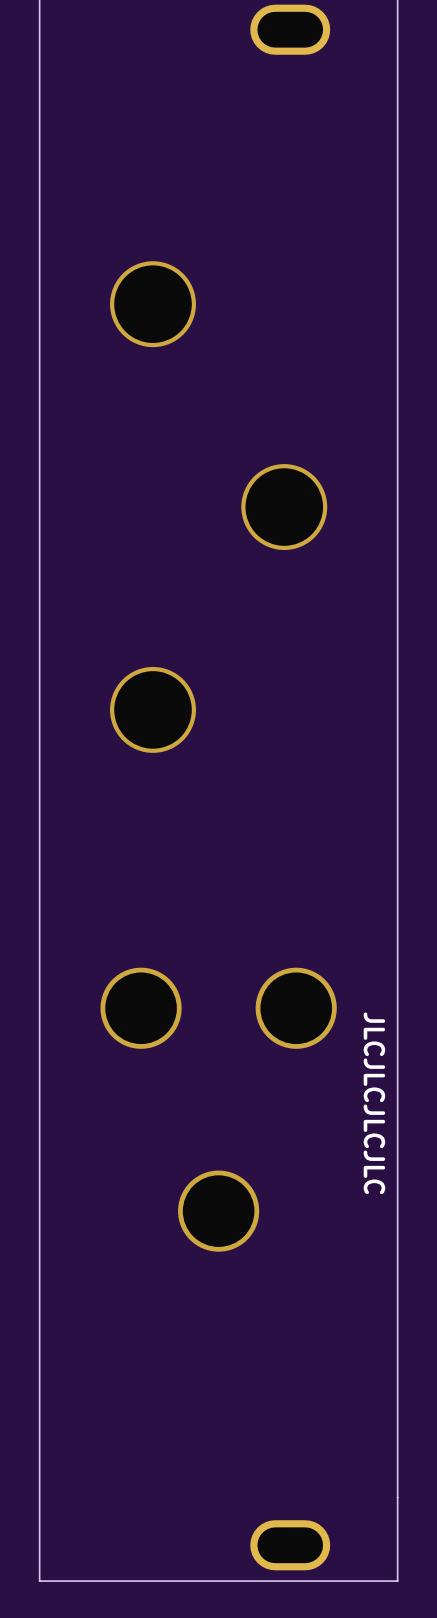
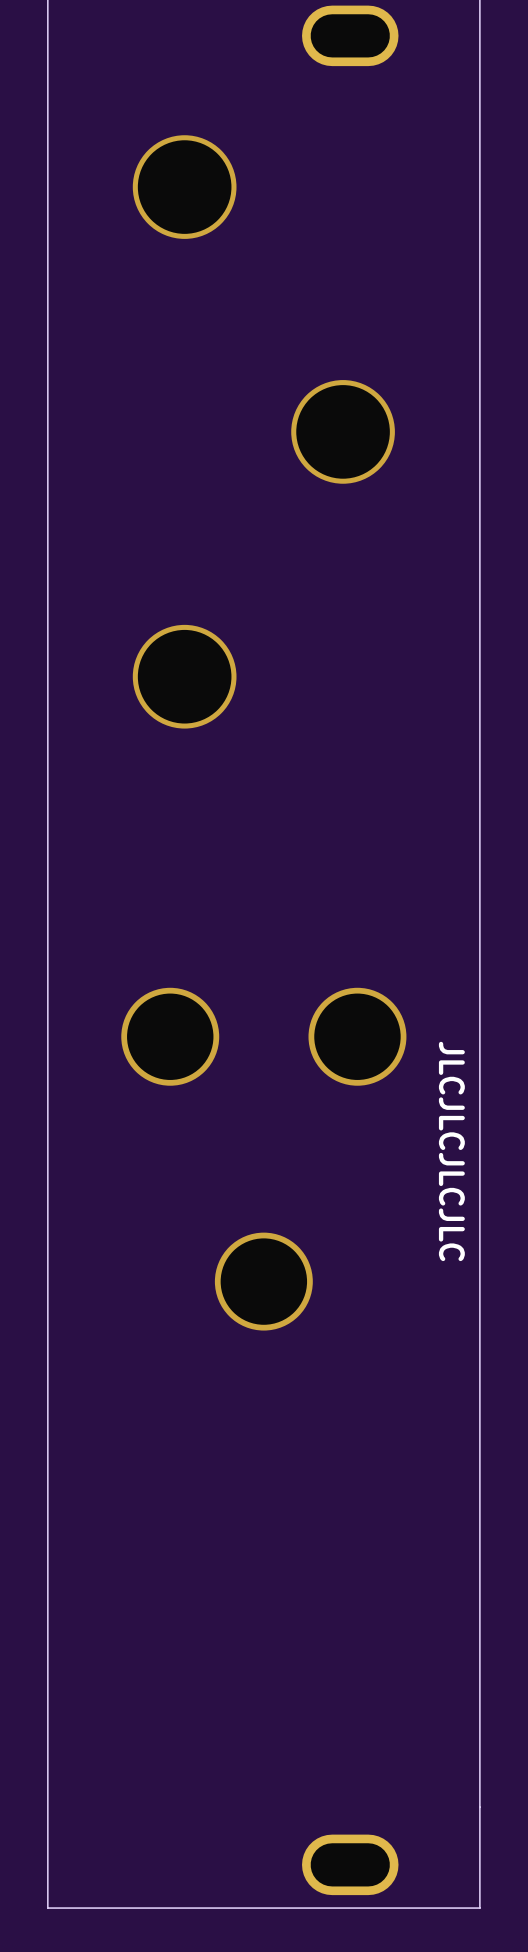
via: none -> (184, 187)
via: (153, 304) -> none
via: none -> (343, 431)
via: (284, 507) -> none
via: none -> (184, 676)
via: (153, 709) -> none
via: none -> (170, 1036)
via: none -> (357, 1036)
via: (141, 1008) -> none
via: (296, 1008) -> none
via: none -> (263, 1281)
text position: JLCJLCJLCJLC (374, 1103) -> JLCJLCJLCJLC (451, 1151)
via: (218, 1211) -> none

